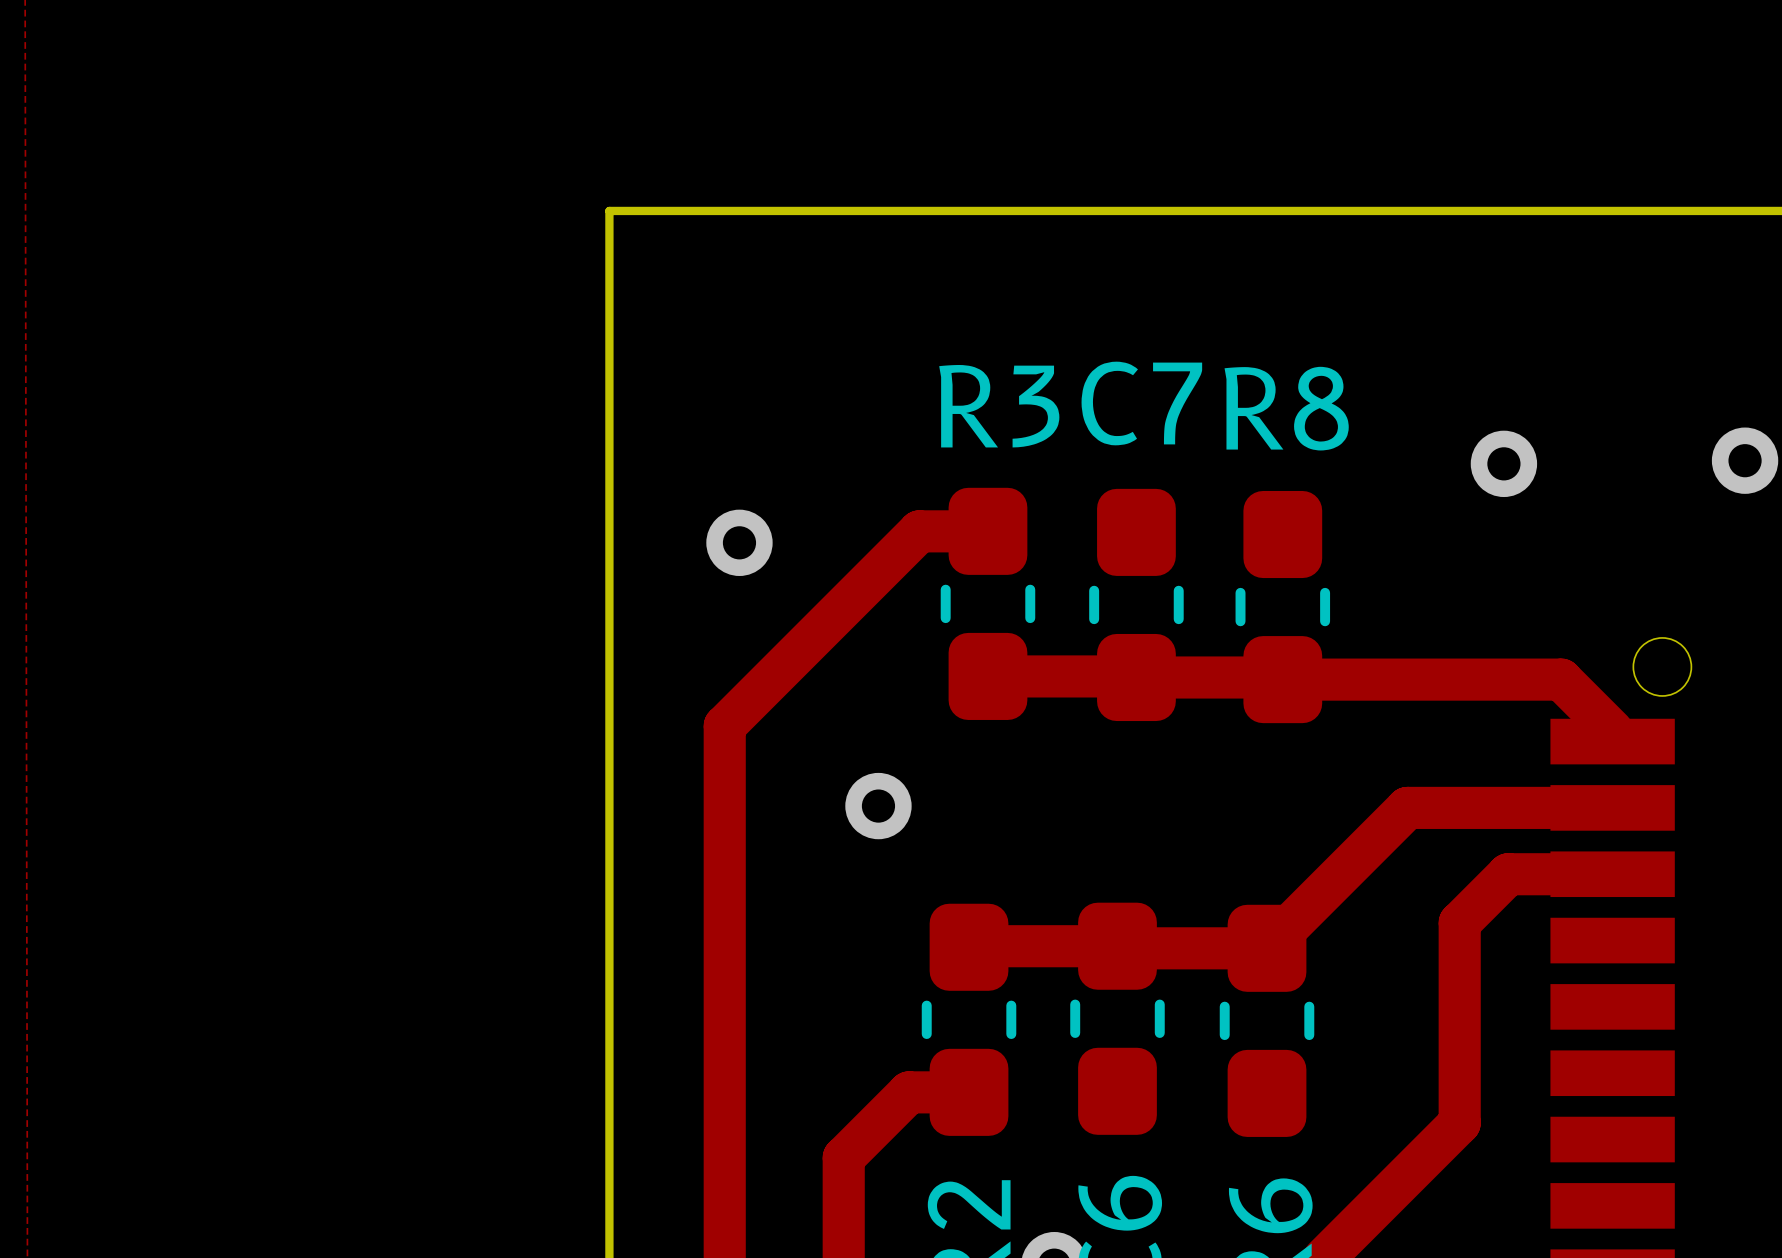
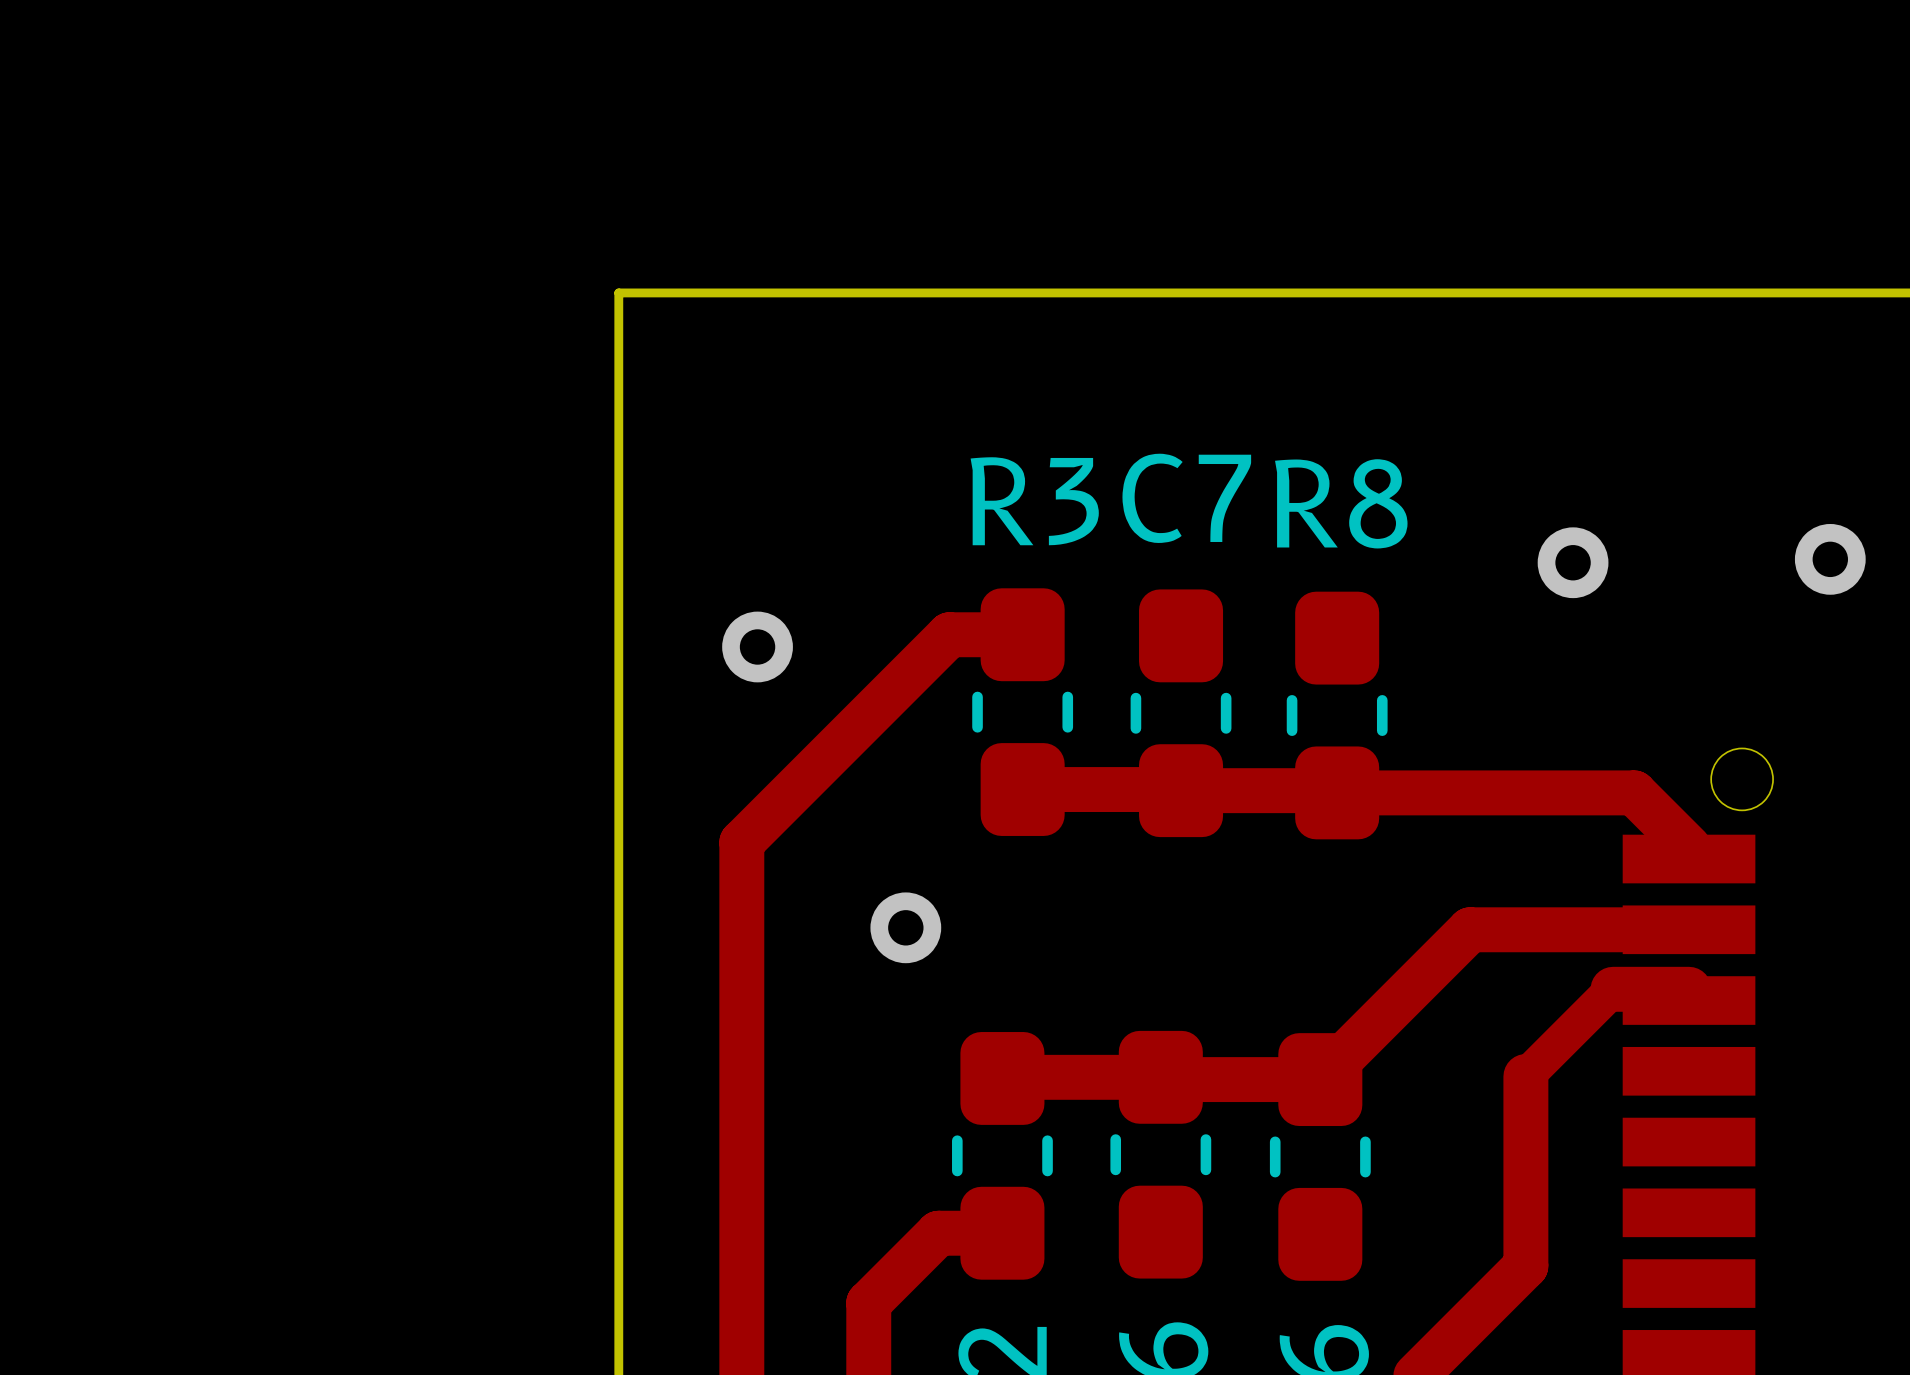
top track: (1612, 874) (1508, 874) (1459, 922) (1459, 945) -> (1689, 989) (1613, 989) (1525, 1076)

